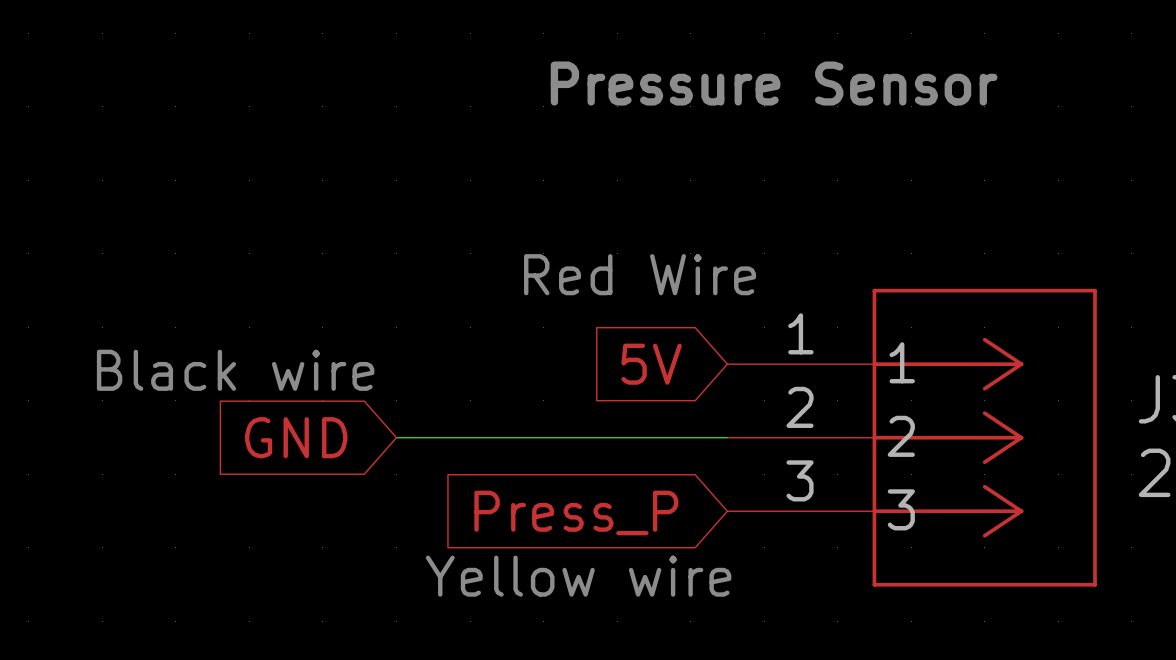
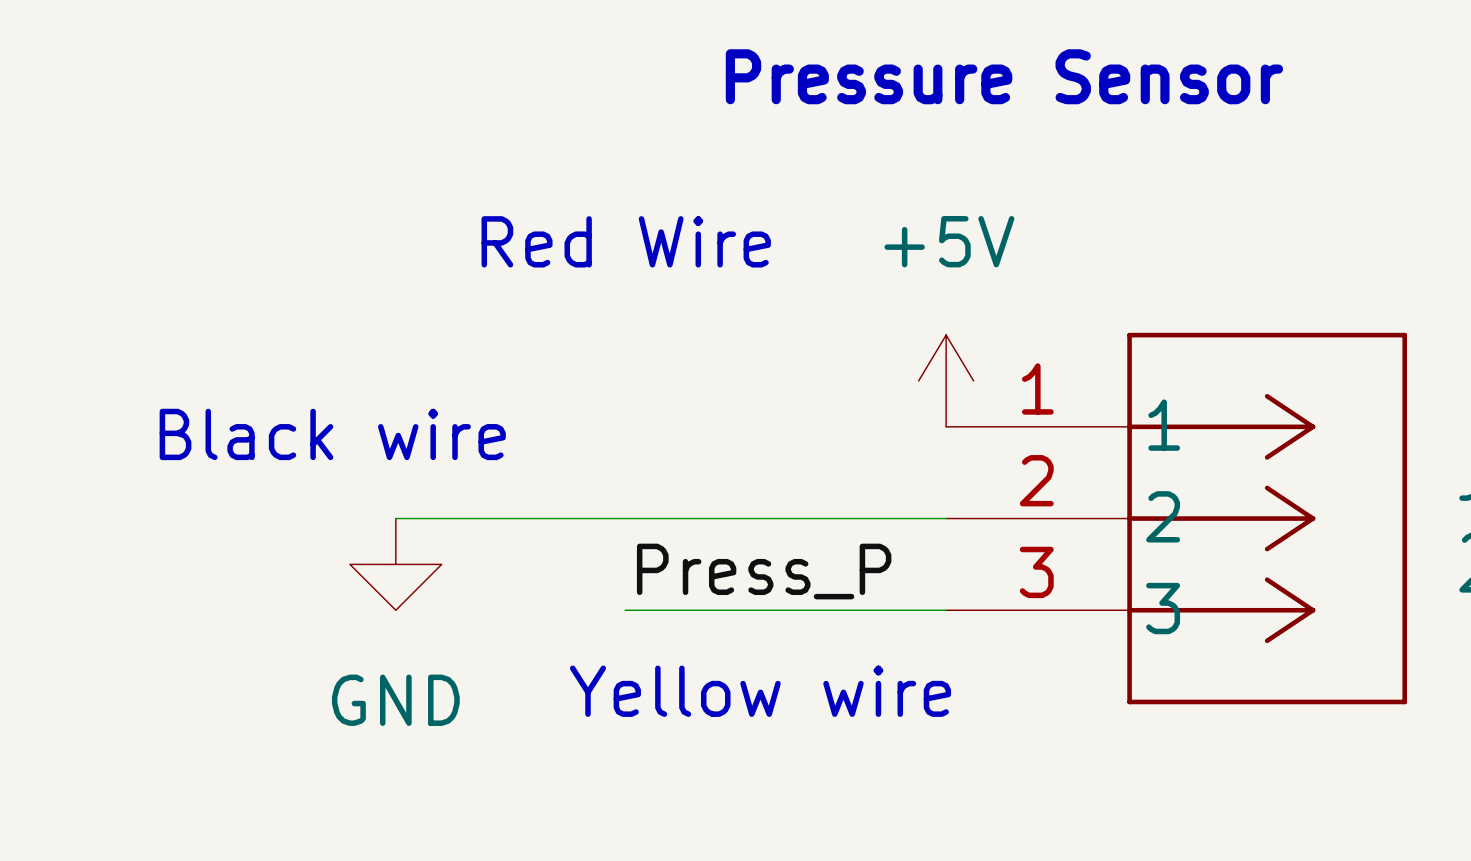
text position: Red Wire (640, 274) -> Red Wire (626, 241)
power symbol: none -> +5V (946, 380)
global label: 5V (651, 364) -> none
wire: none -> (395, 518) (533, 518)
global label: GND (296, 437) -> none
power symbol: none -> GND (395, 564)
label: none -> Press_P (764, 571)
wire: none -> (625, 610) (946, 610)
global label: Press_P (576, 512) -> none

